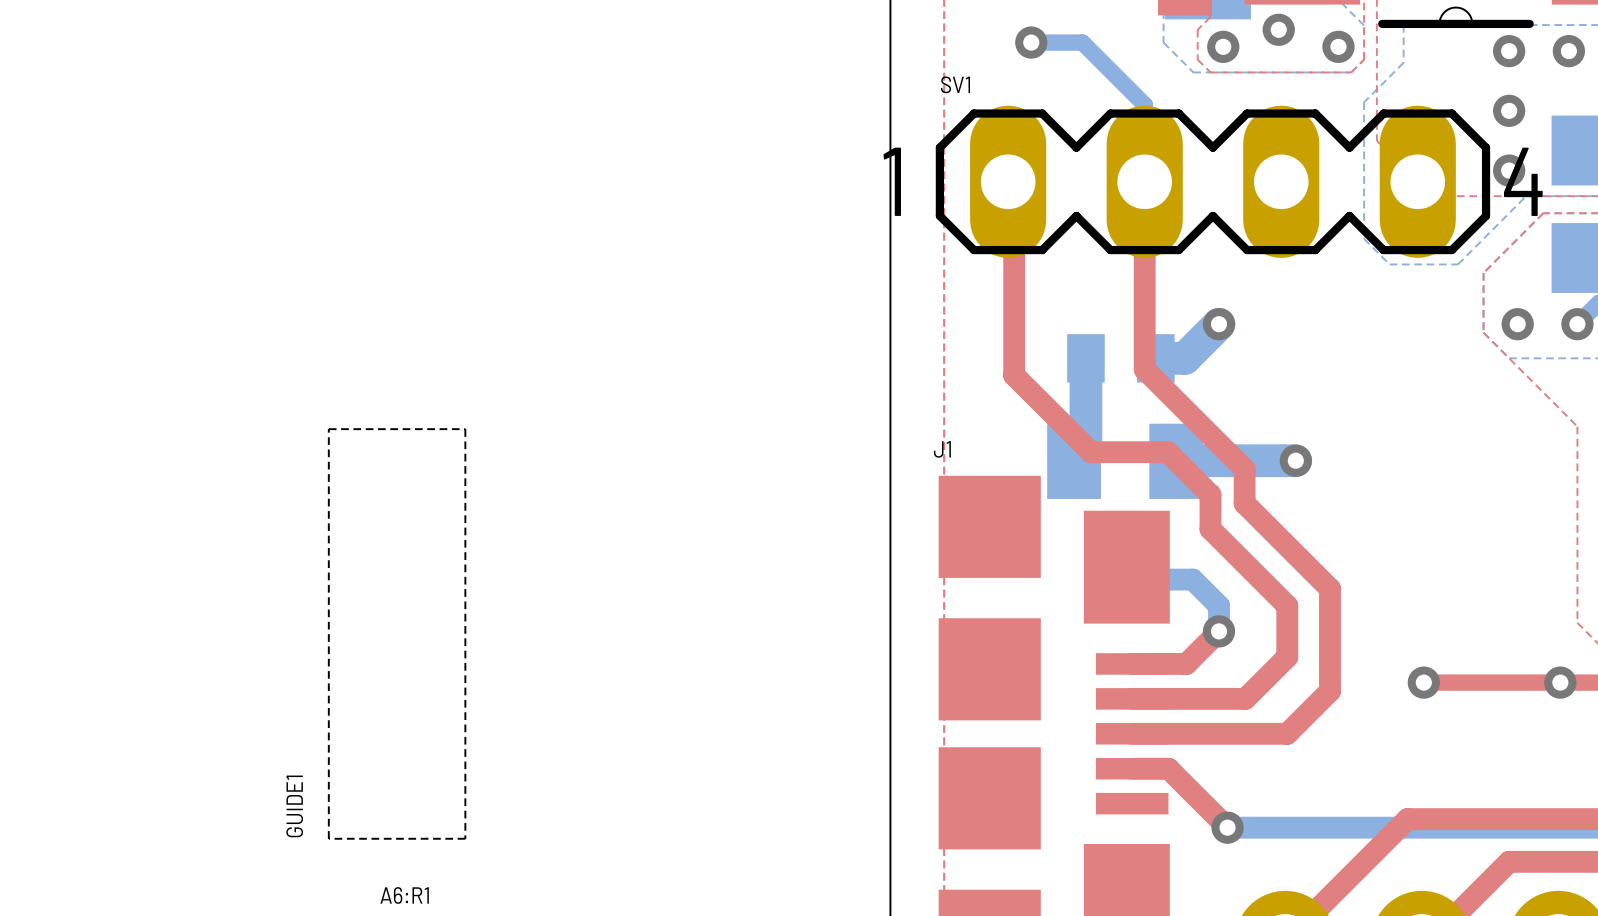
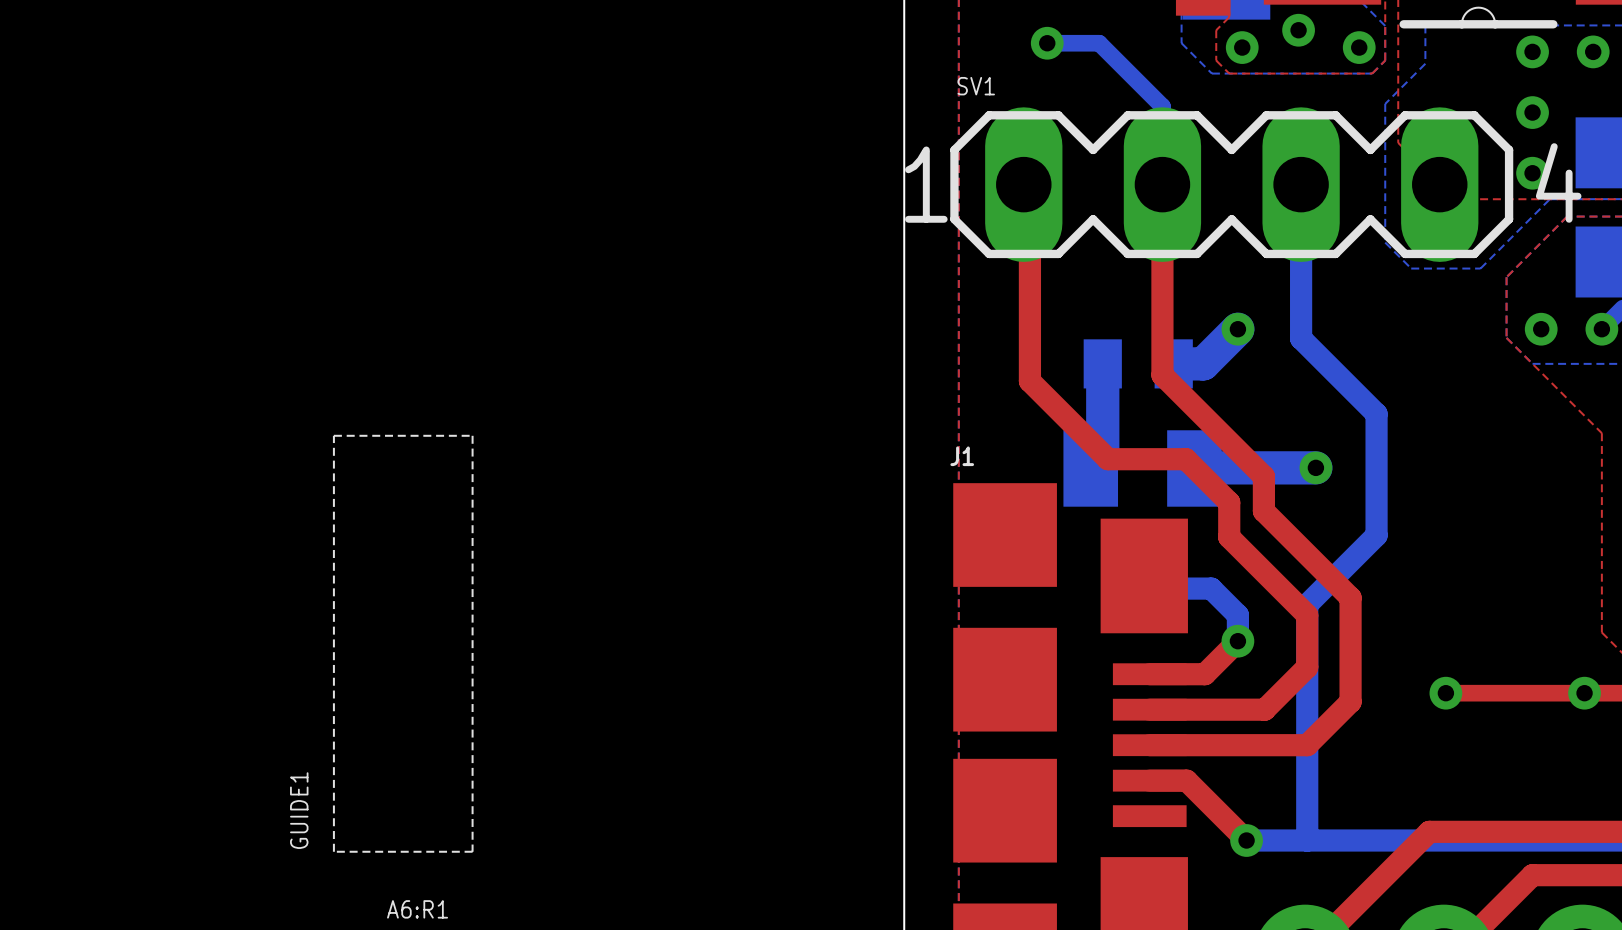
bottom track: none -> (1301, 184) (1301, 338) (1376, 414) (1376, 535) (1307, 604) (1307, 840)

